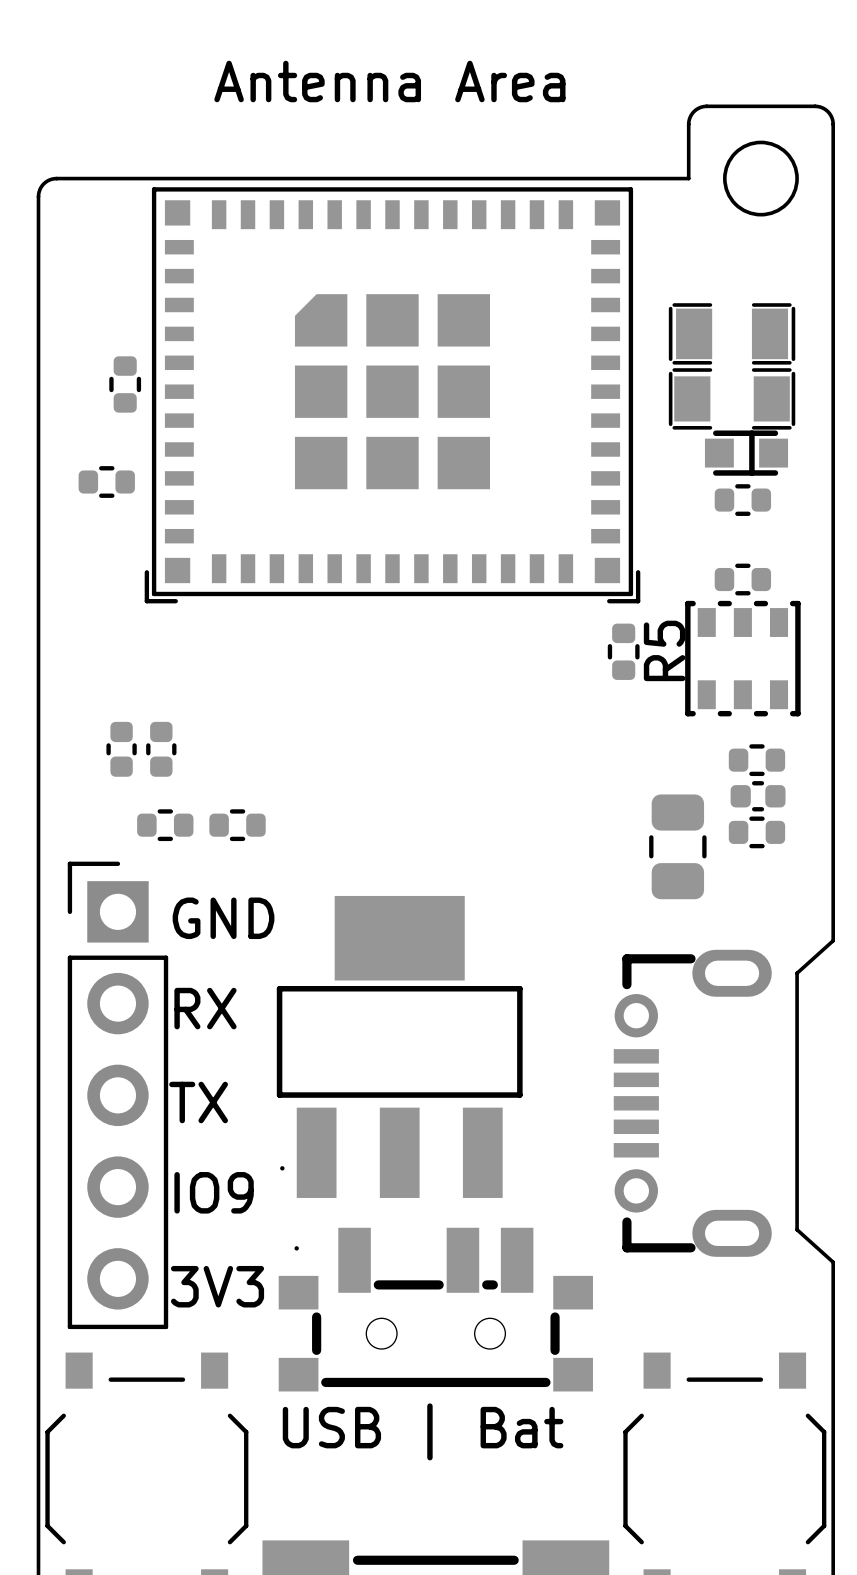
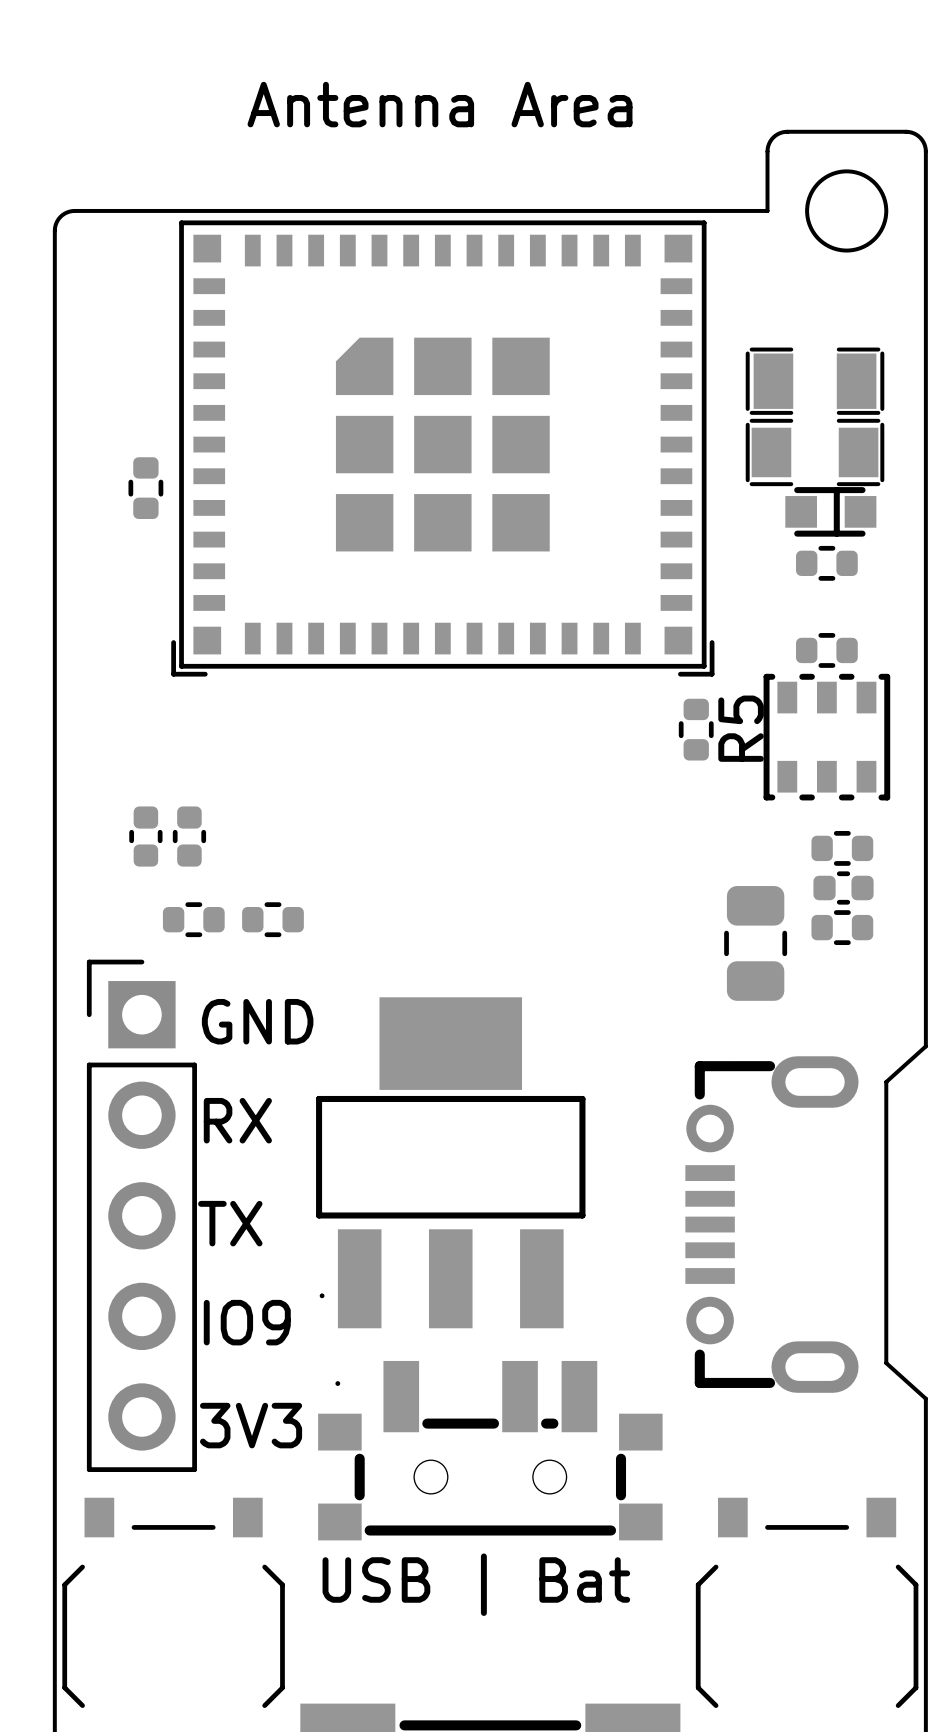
part: (125, 384) -> none
part: none -> (145, 488)
part: (106, 482) -> none

